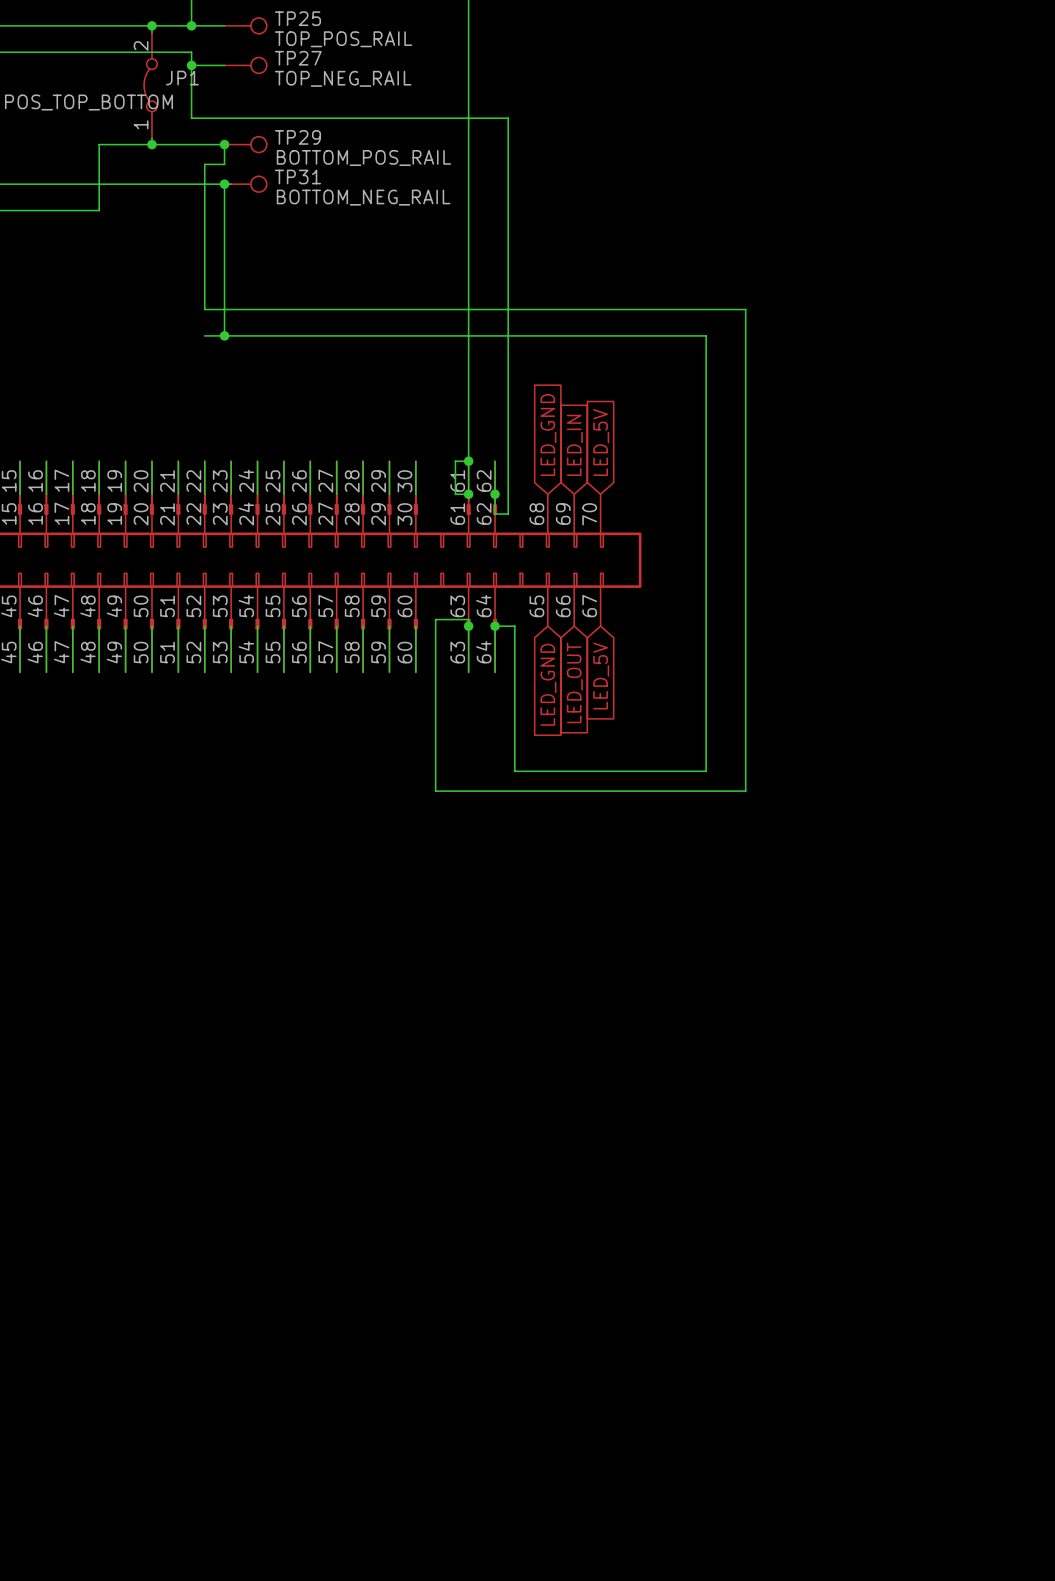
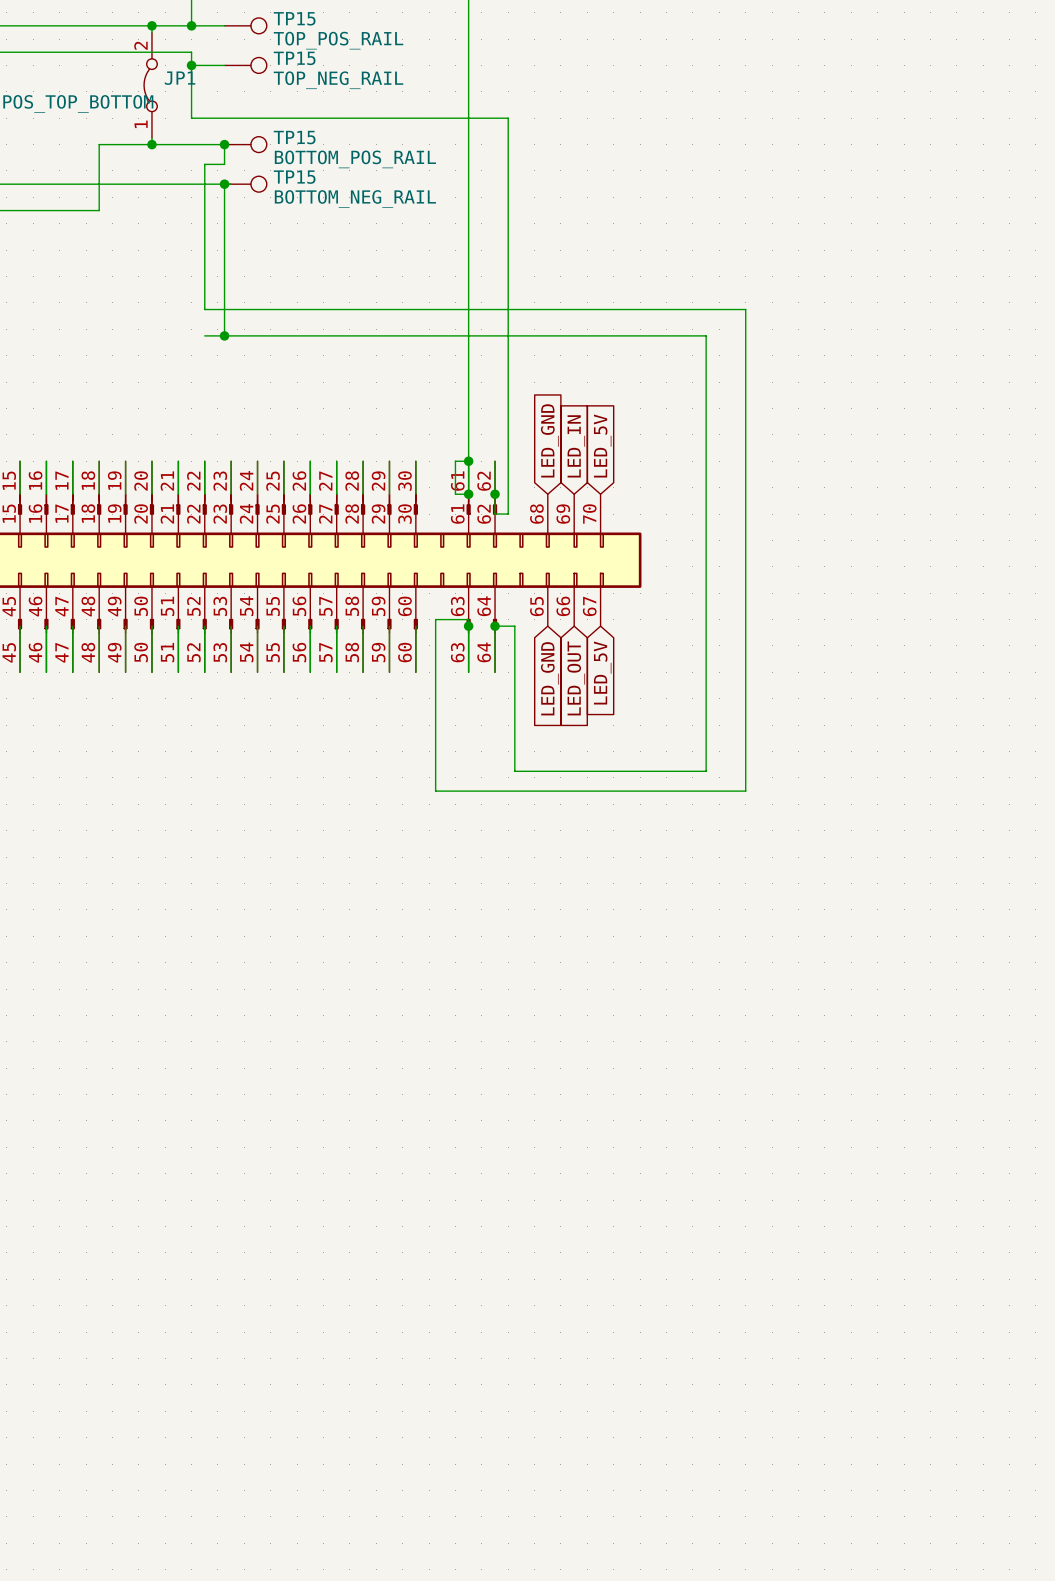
TP25 name: TP25 (297, 18) -> TP15 (294, 18)
TP27 name: TP27 (298, 58) -> TP15 (294, 58)
TP29 name: TP29 (297, 137) -> TP15 (294, 137)
TP31 name: TP31 (297, 177) -> TP15 (294, 177)

